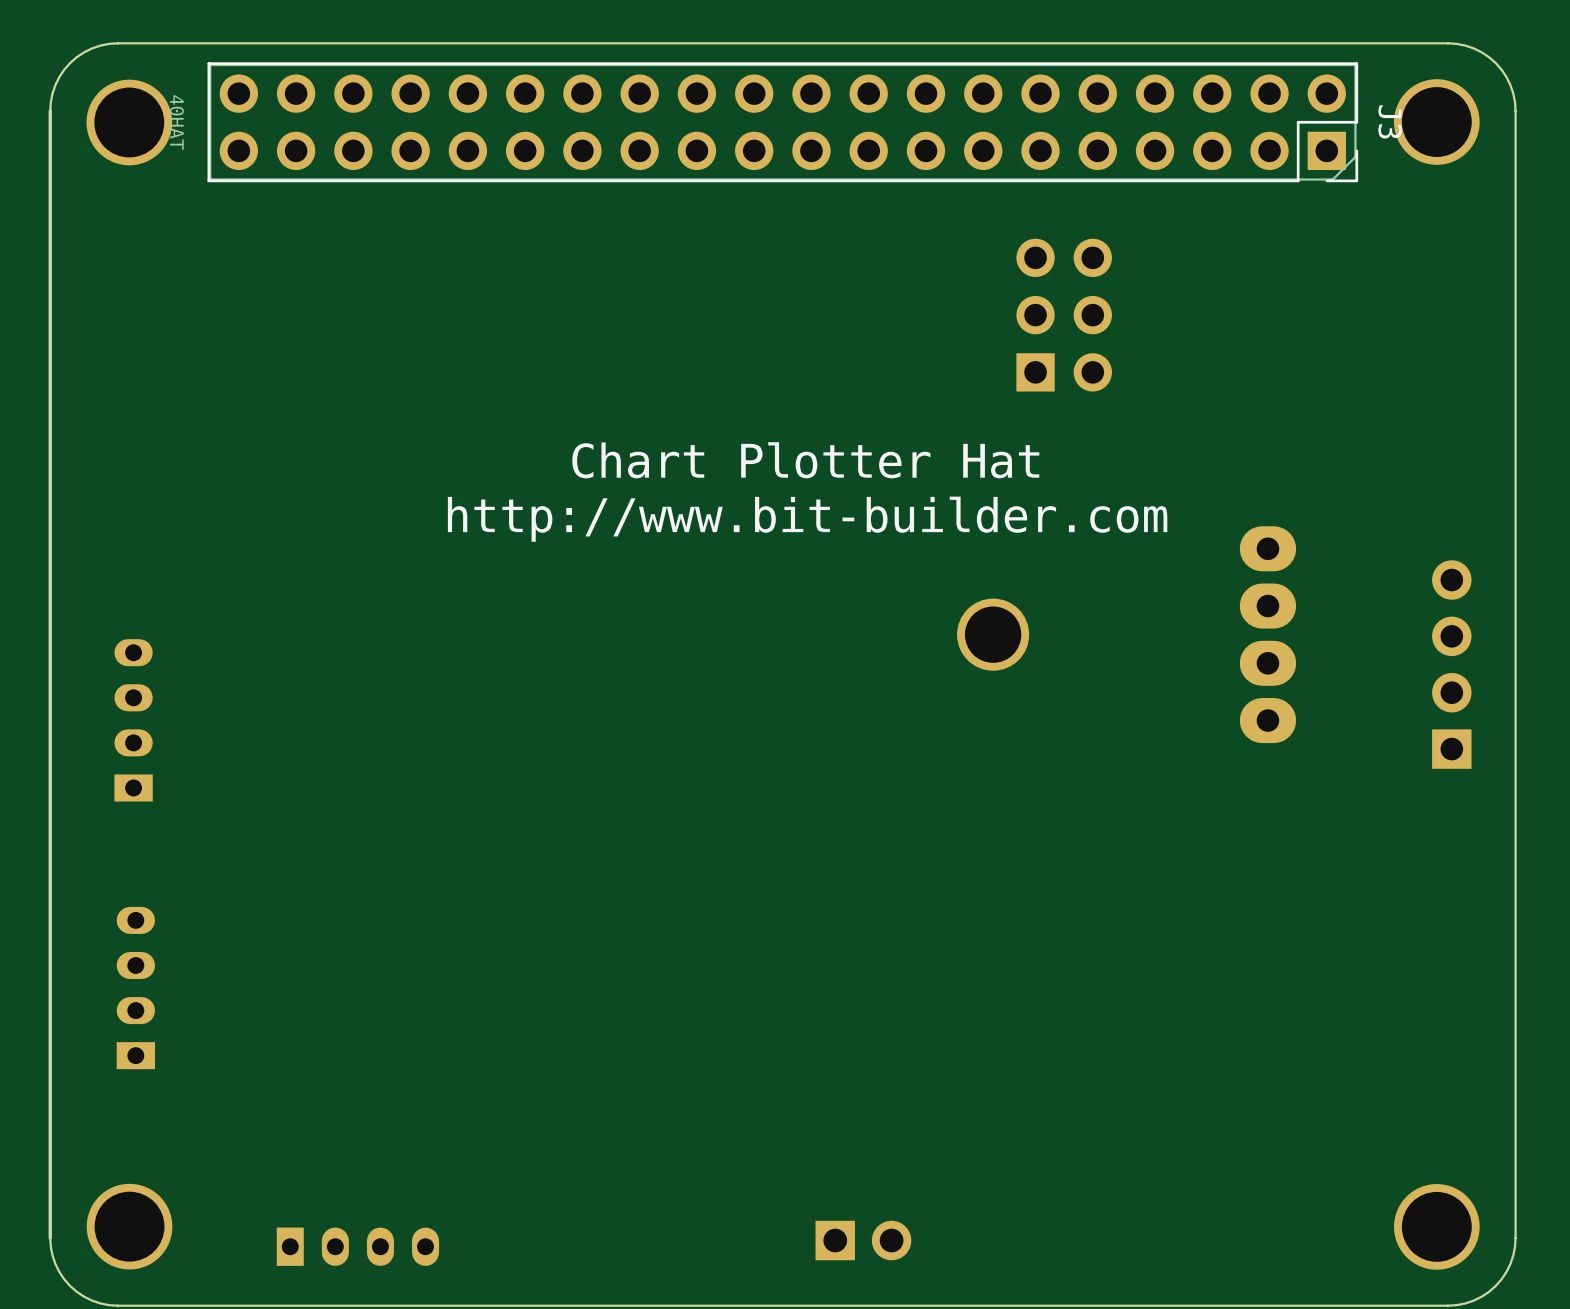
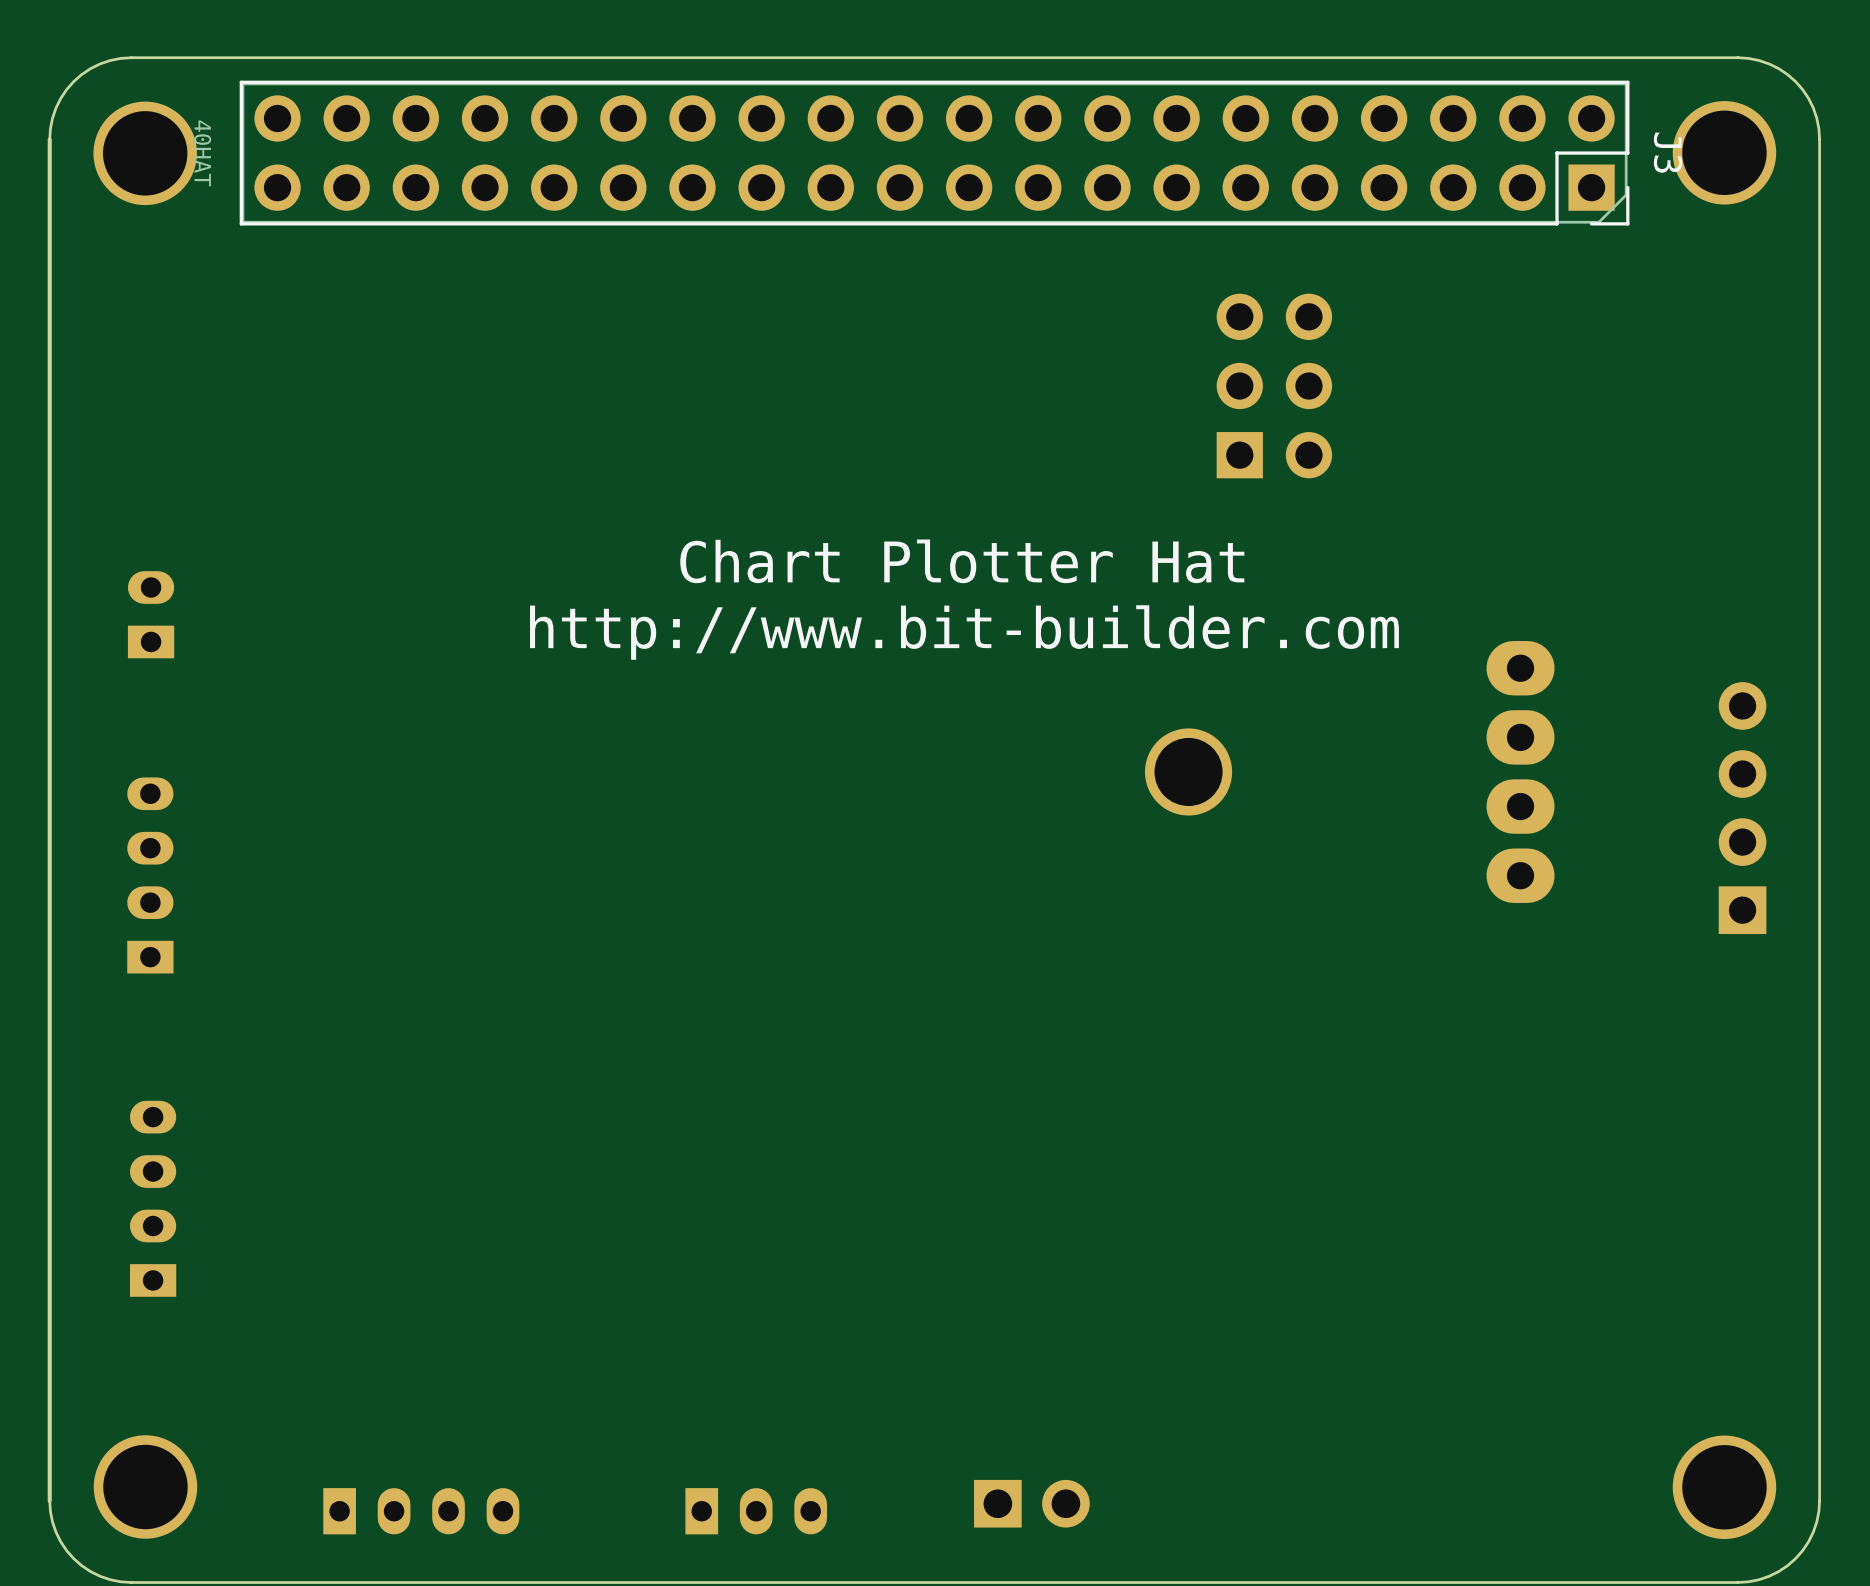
part: none -> (151, 614)
part: none -> (756, 1511)

